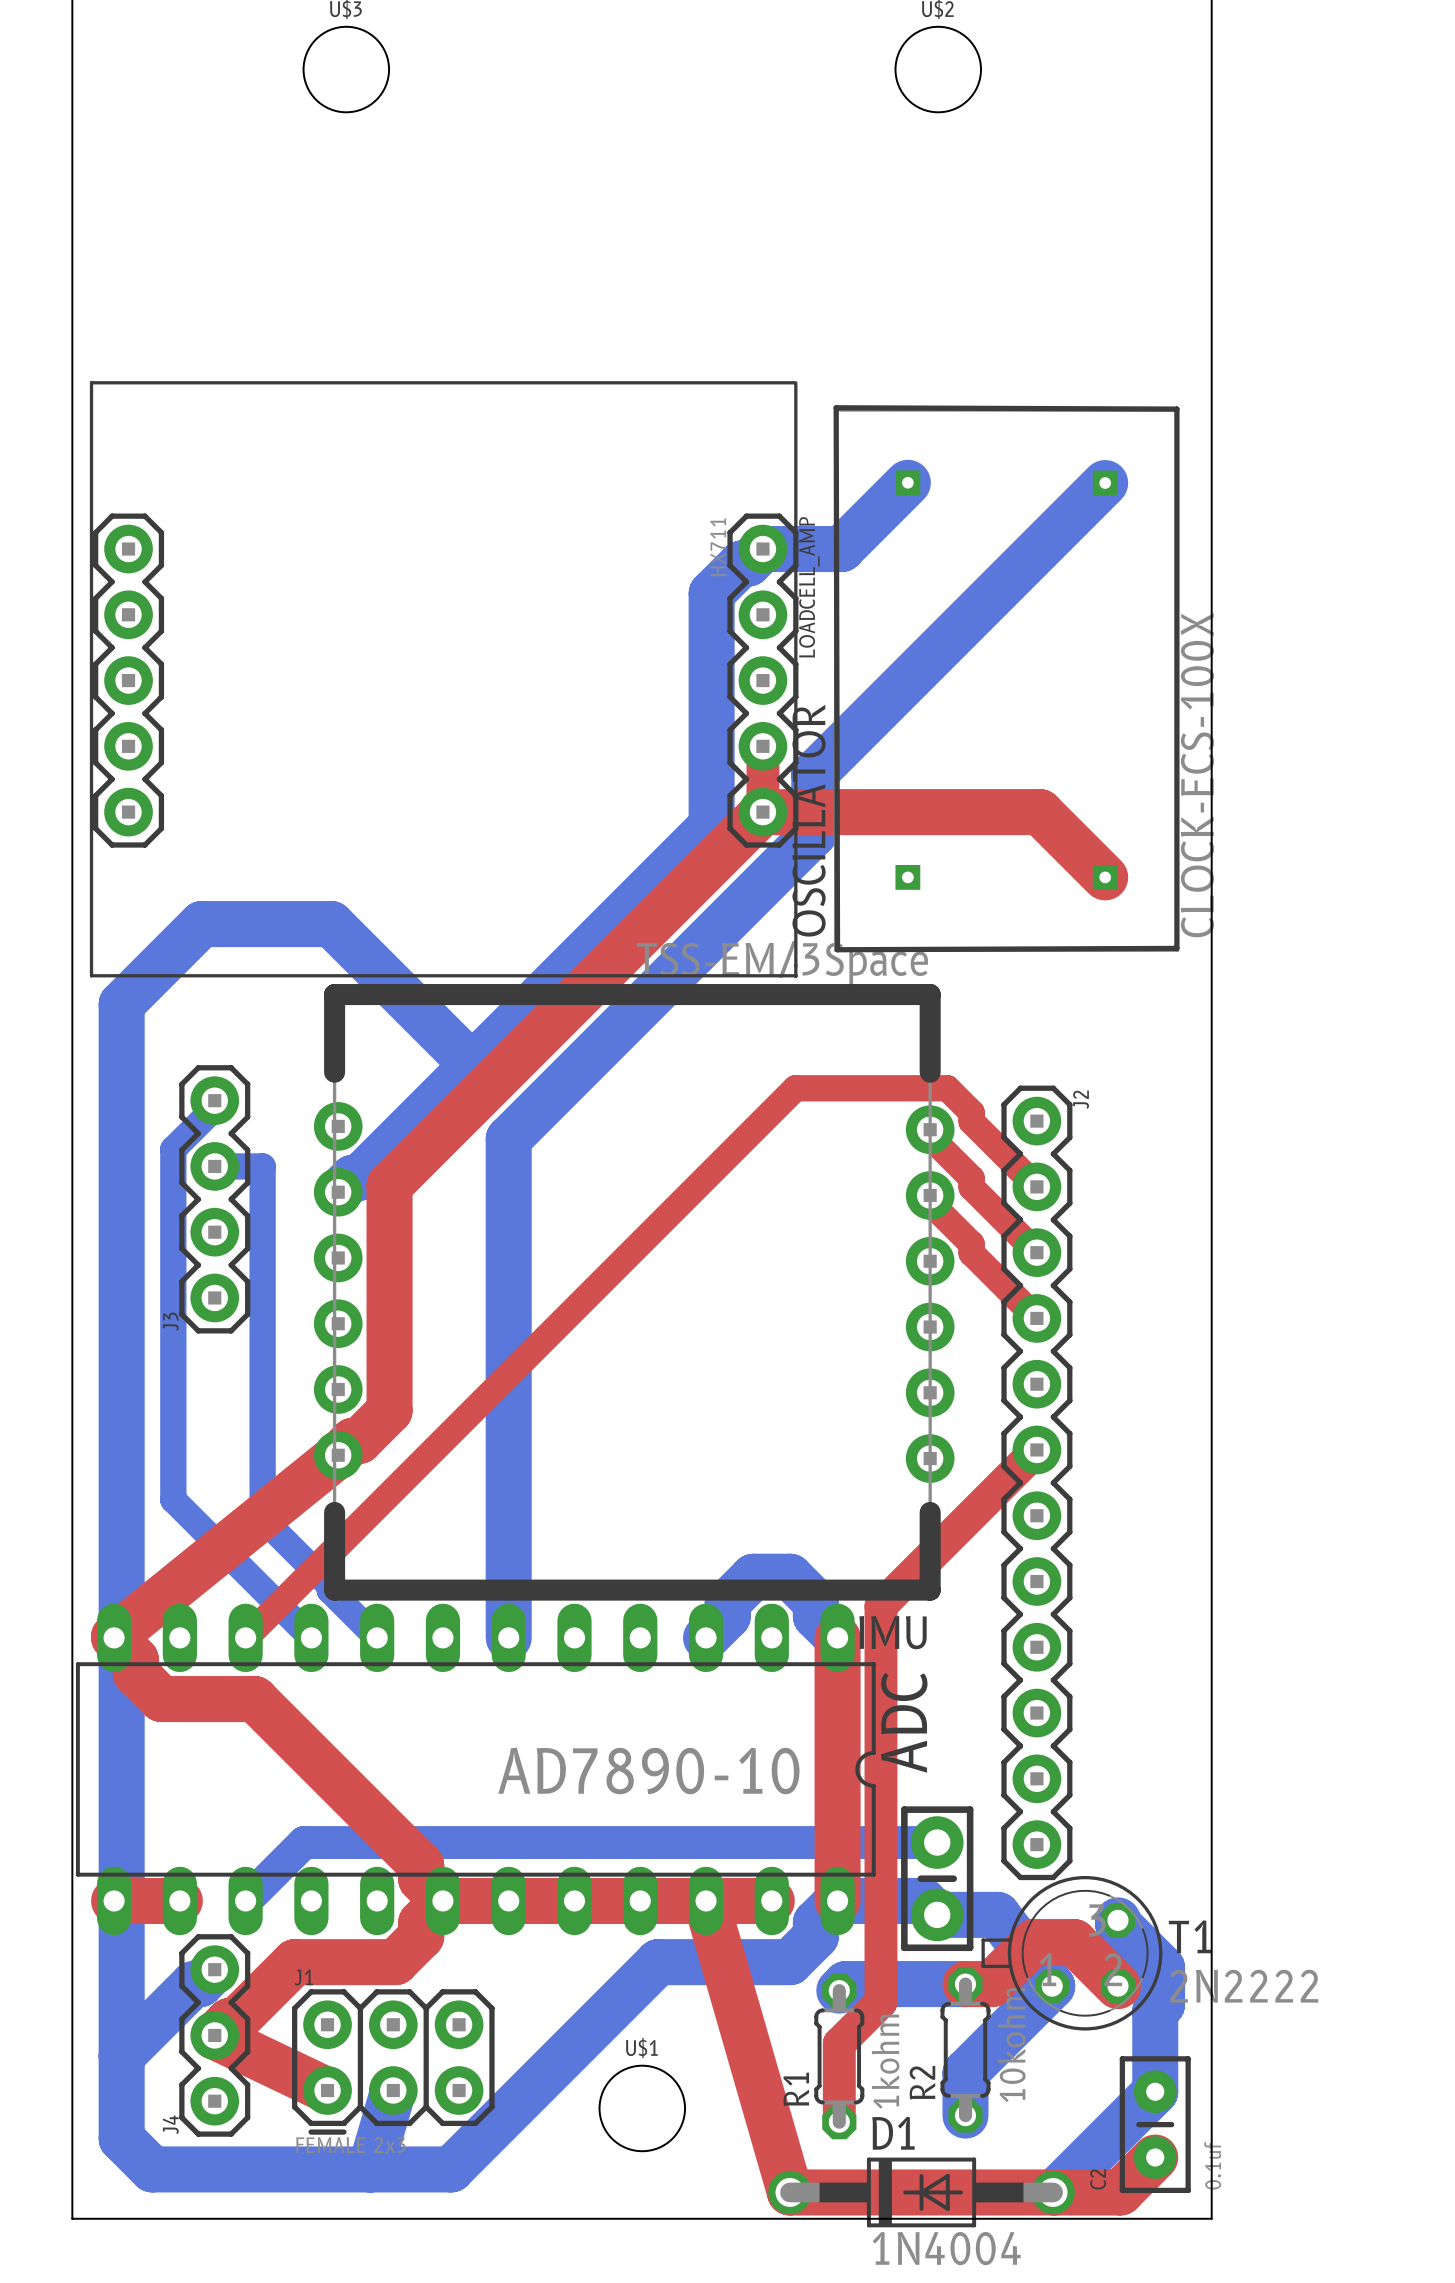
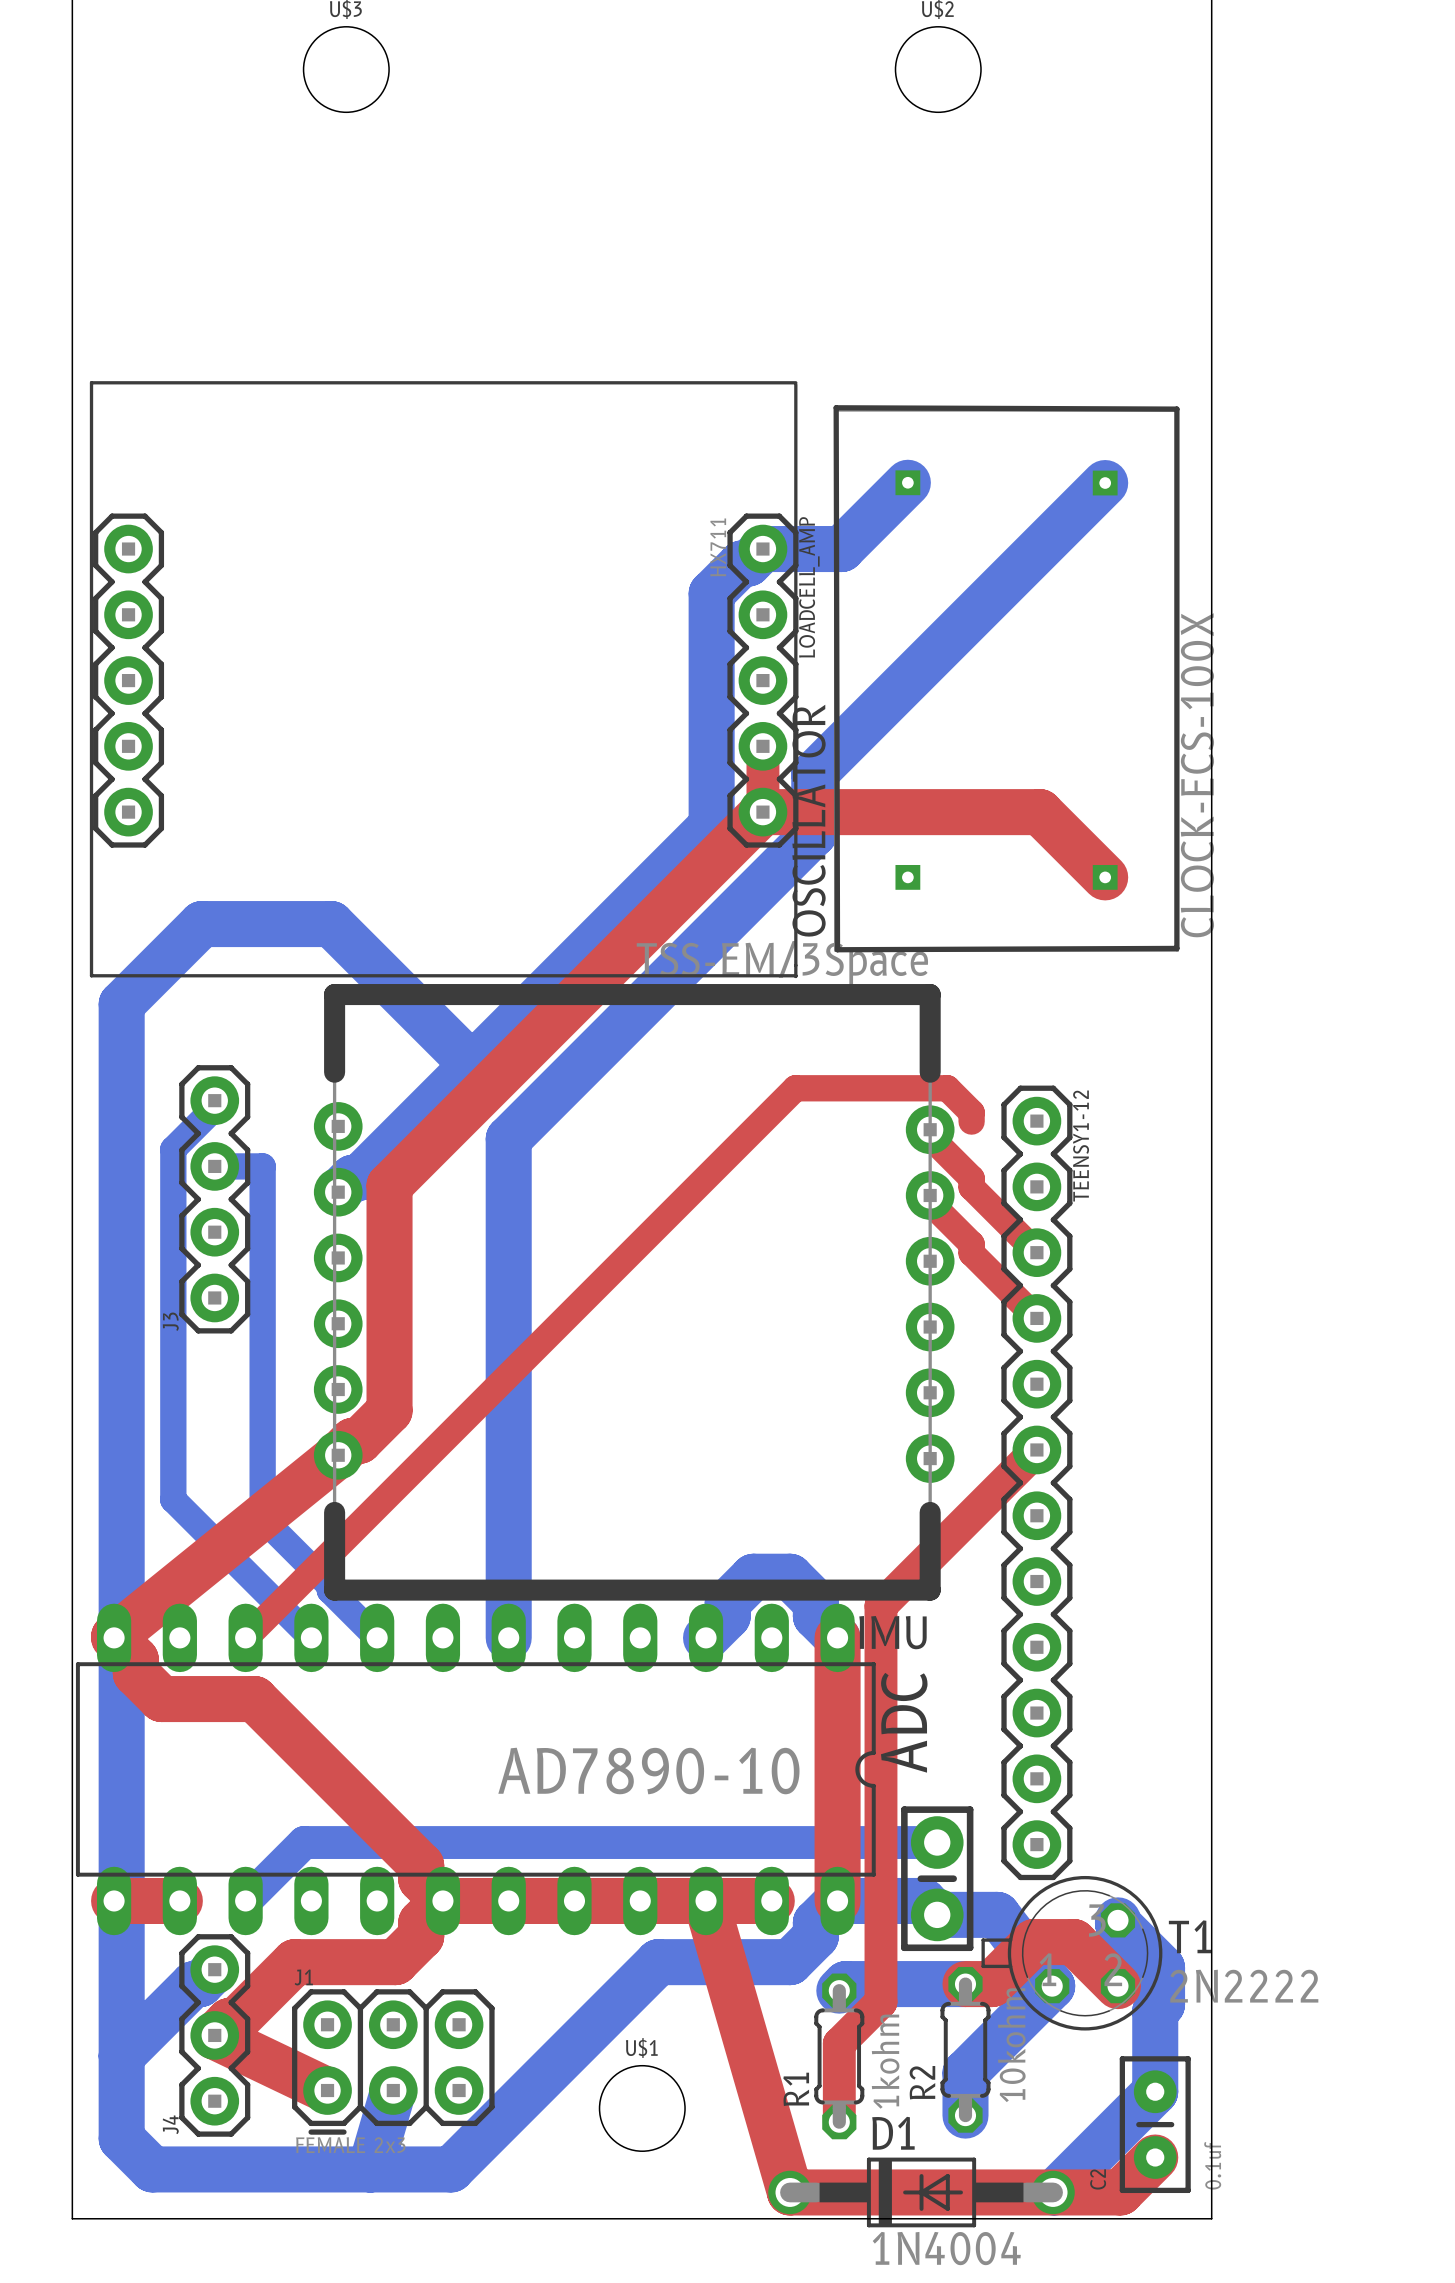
J2 name: J2 (1081, 1099) -> TEENSY1-12 (1081, 1146)
top track: (971, 1121) (1036, 1186) -> none

